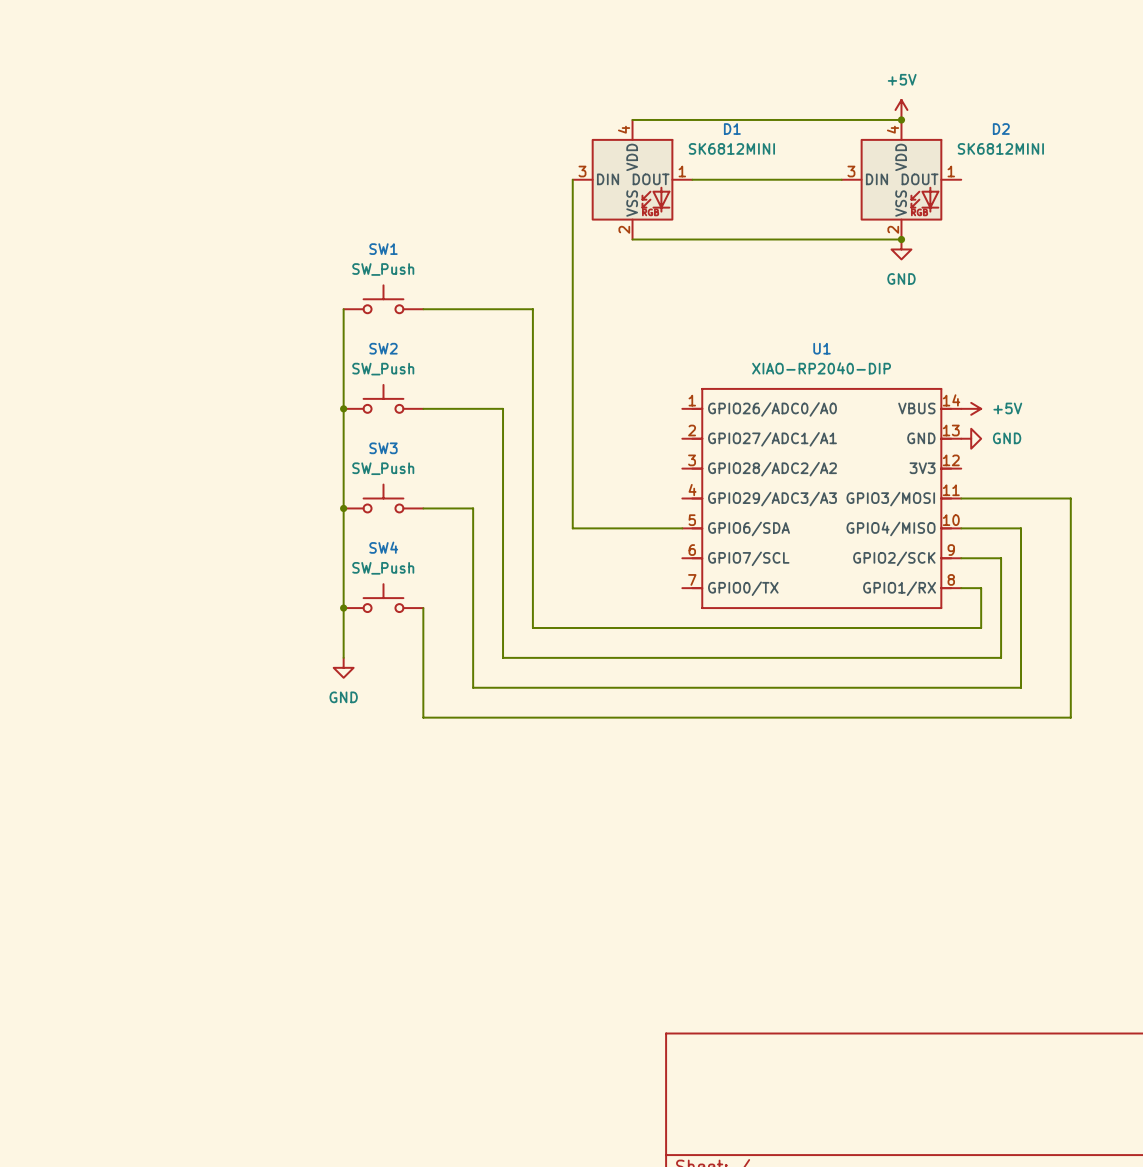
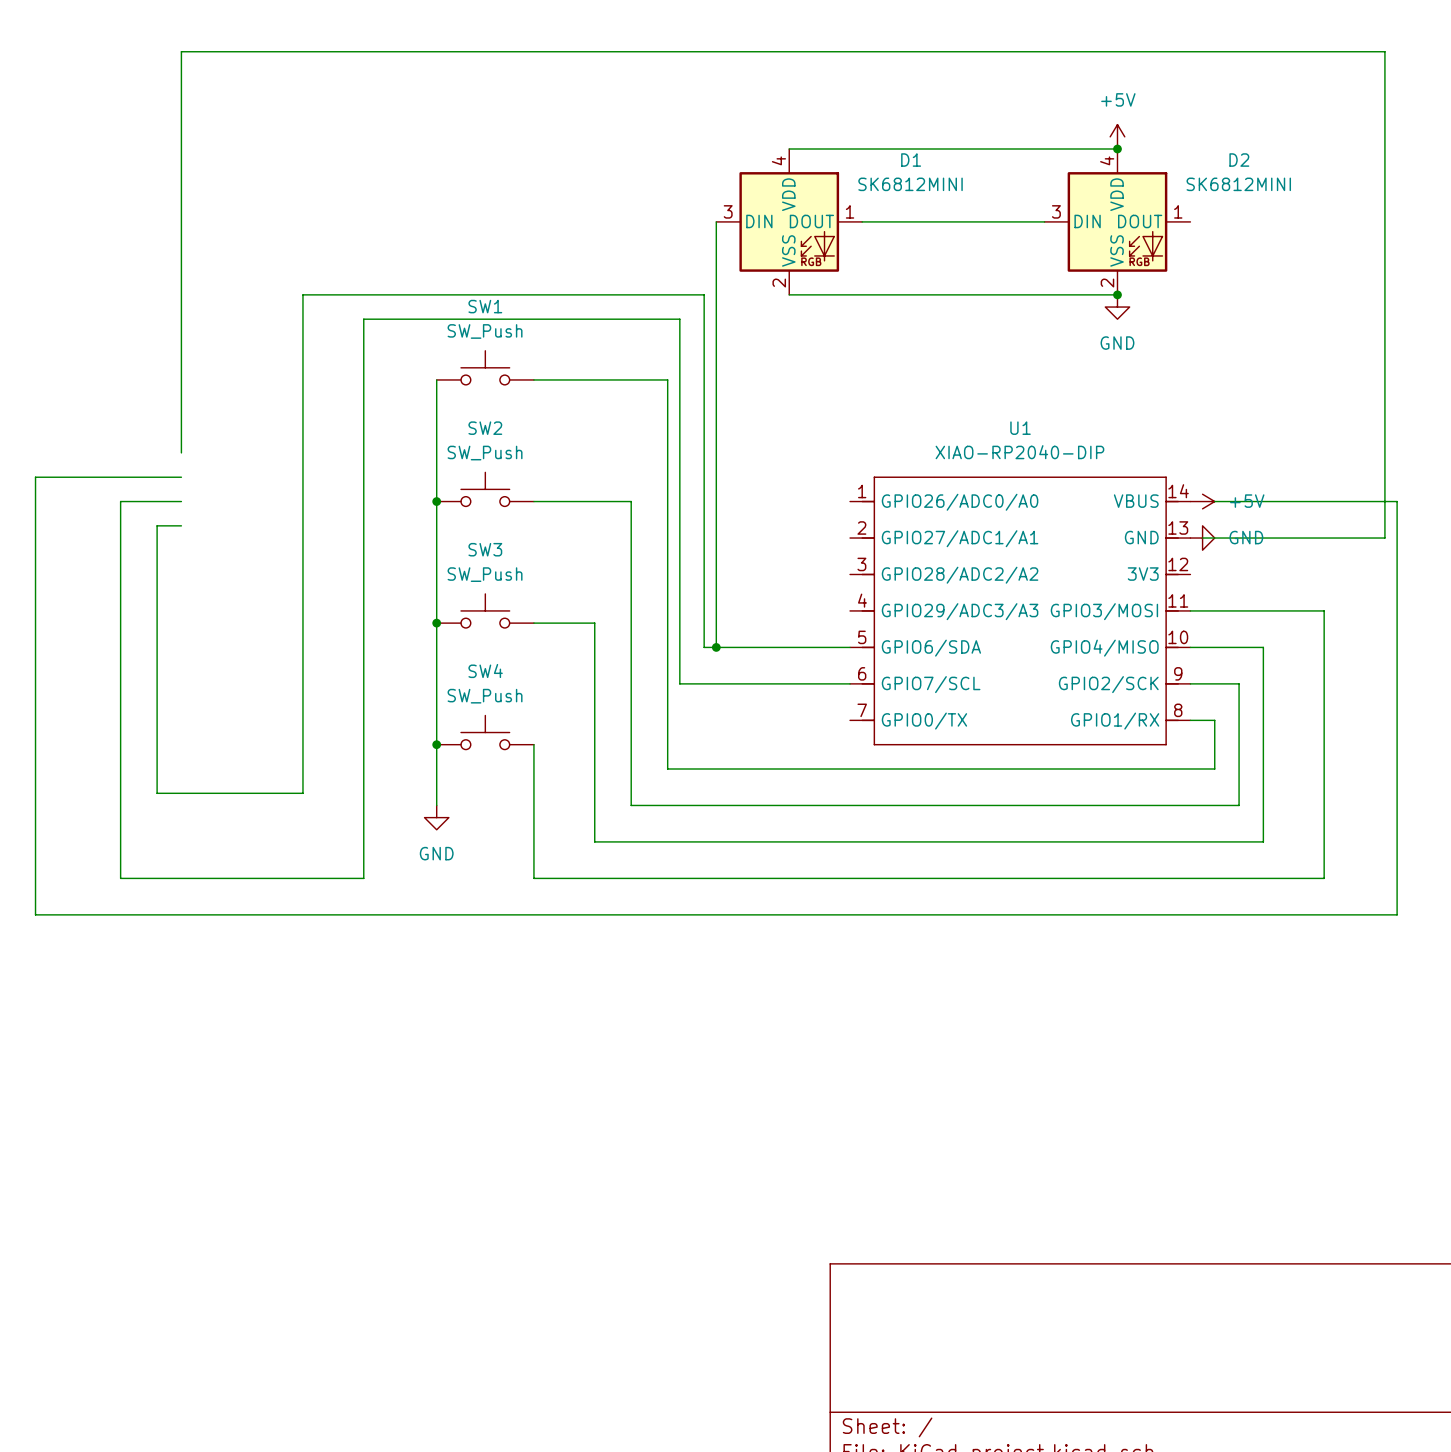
wire: none -> (181, 452) (181, 51) (1384, 51) (1384, 538) (1202, 538)
wire: none -> (181, 477) (35, 477) (35, 914) (1397, 914) (1397, 501) (1214, 501)
wire: none -> (181, 501) (120, 501) (120, 878) (363, 878) (363, 319) (679, 319) (679, 683) (850, 683)
wire: none -> (181, 525) (157, 525) (157, 793) (302, 793) (302, 294) (704, 294) (704, 647) (716, 647)
junction: none -> (716, 647)

